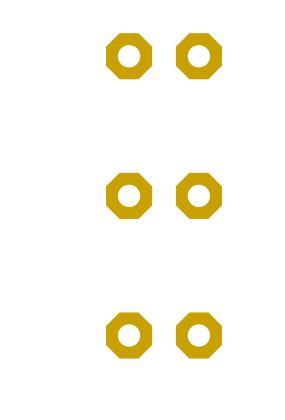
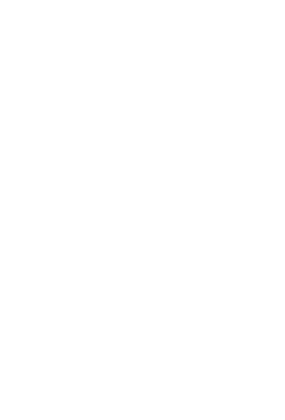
part: (163, 56) -> none
part: (163, 195) -> none
part: (163, 335) -> none

